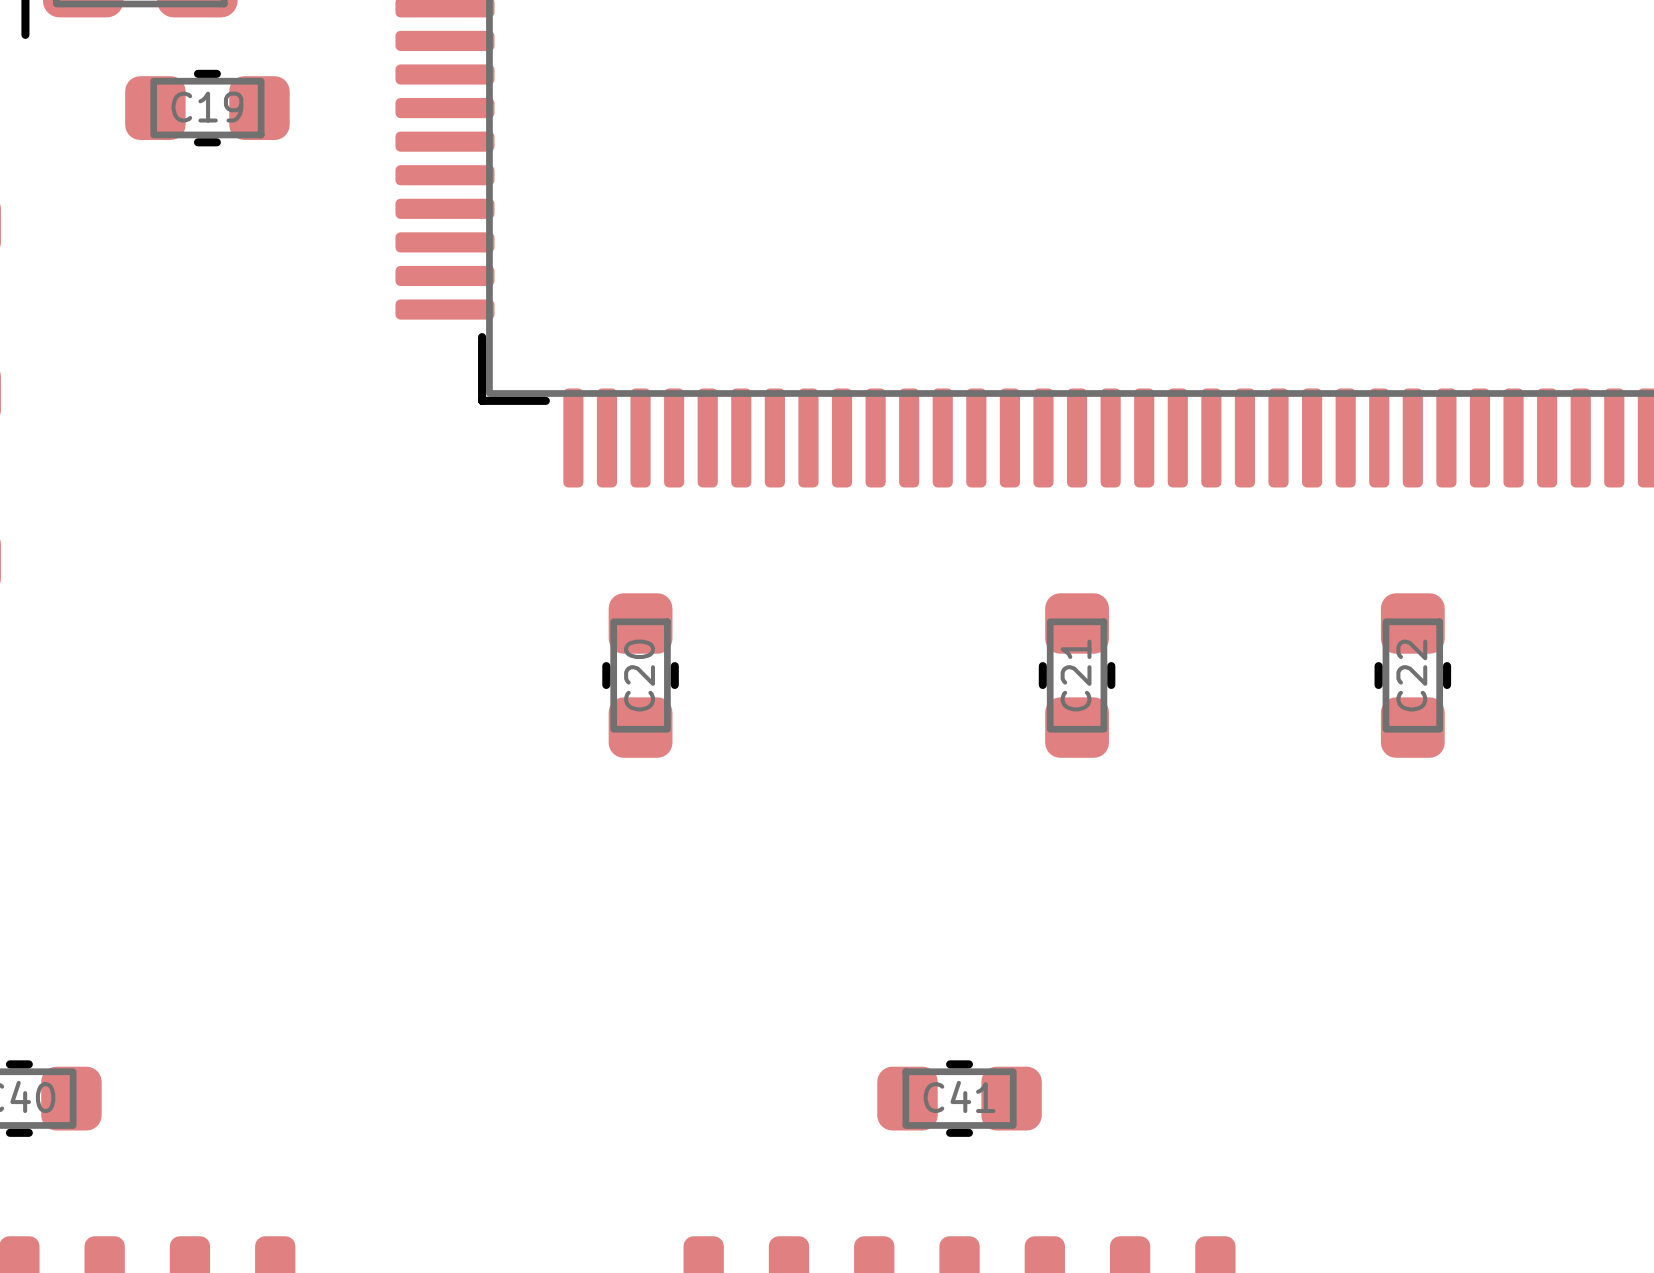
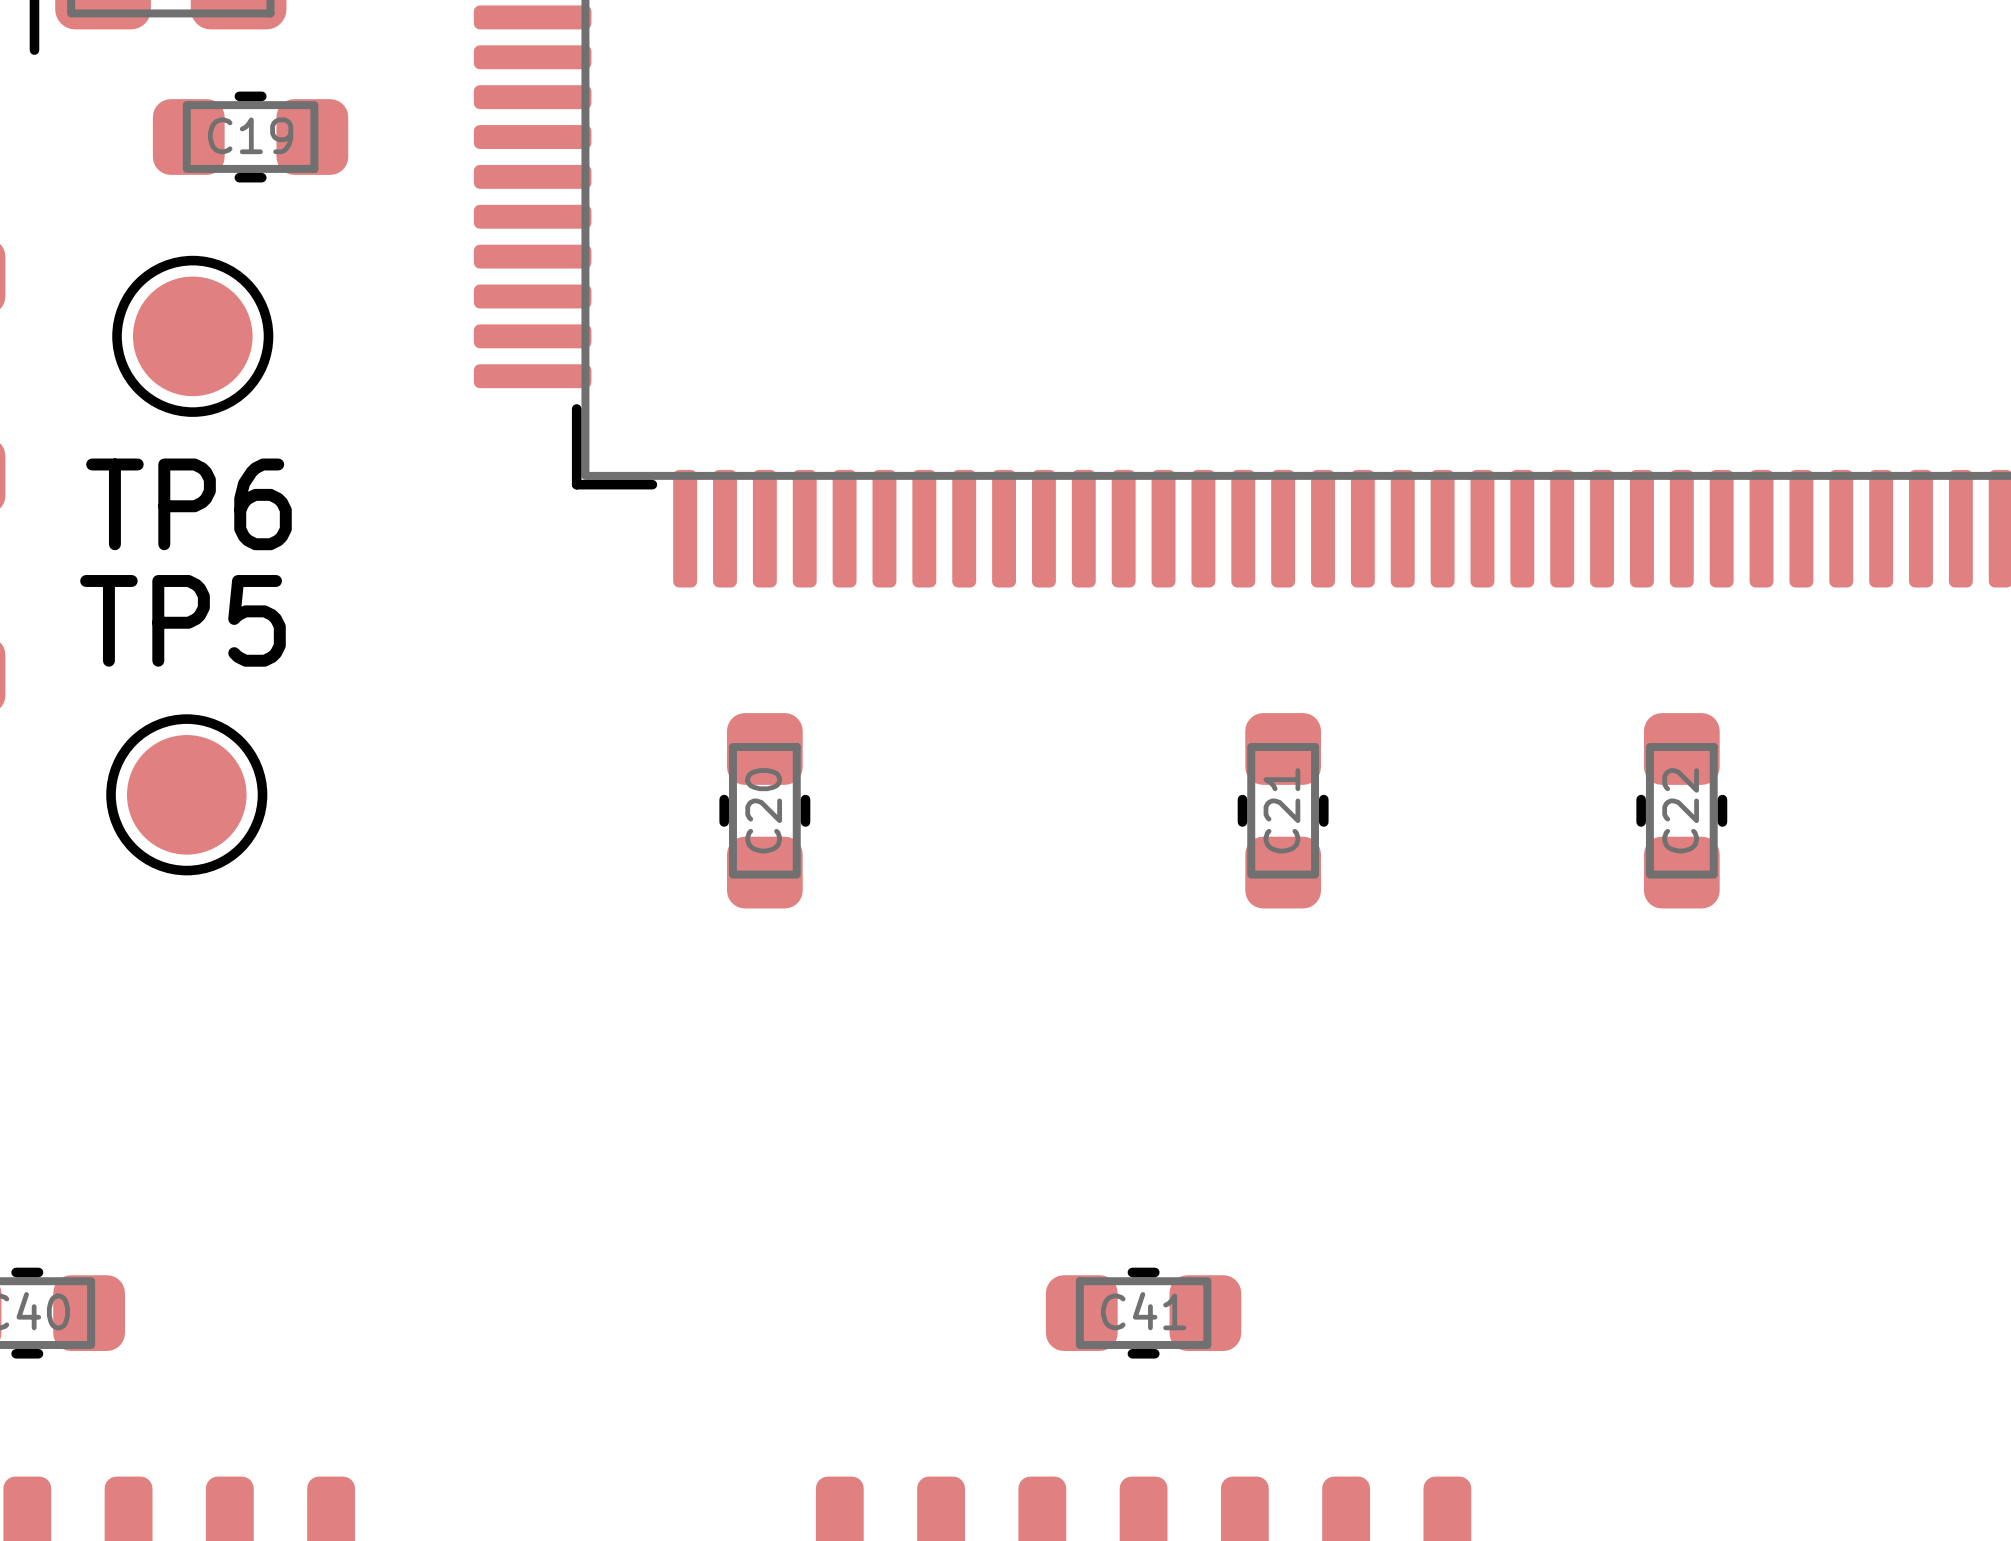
TP6: none -> (192, 336)
TP5: none -> (186, 794)

